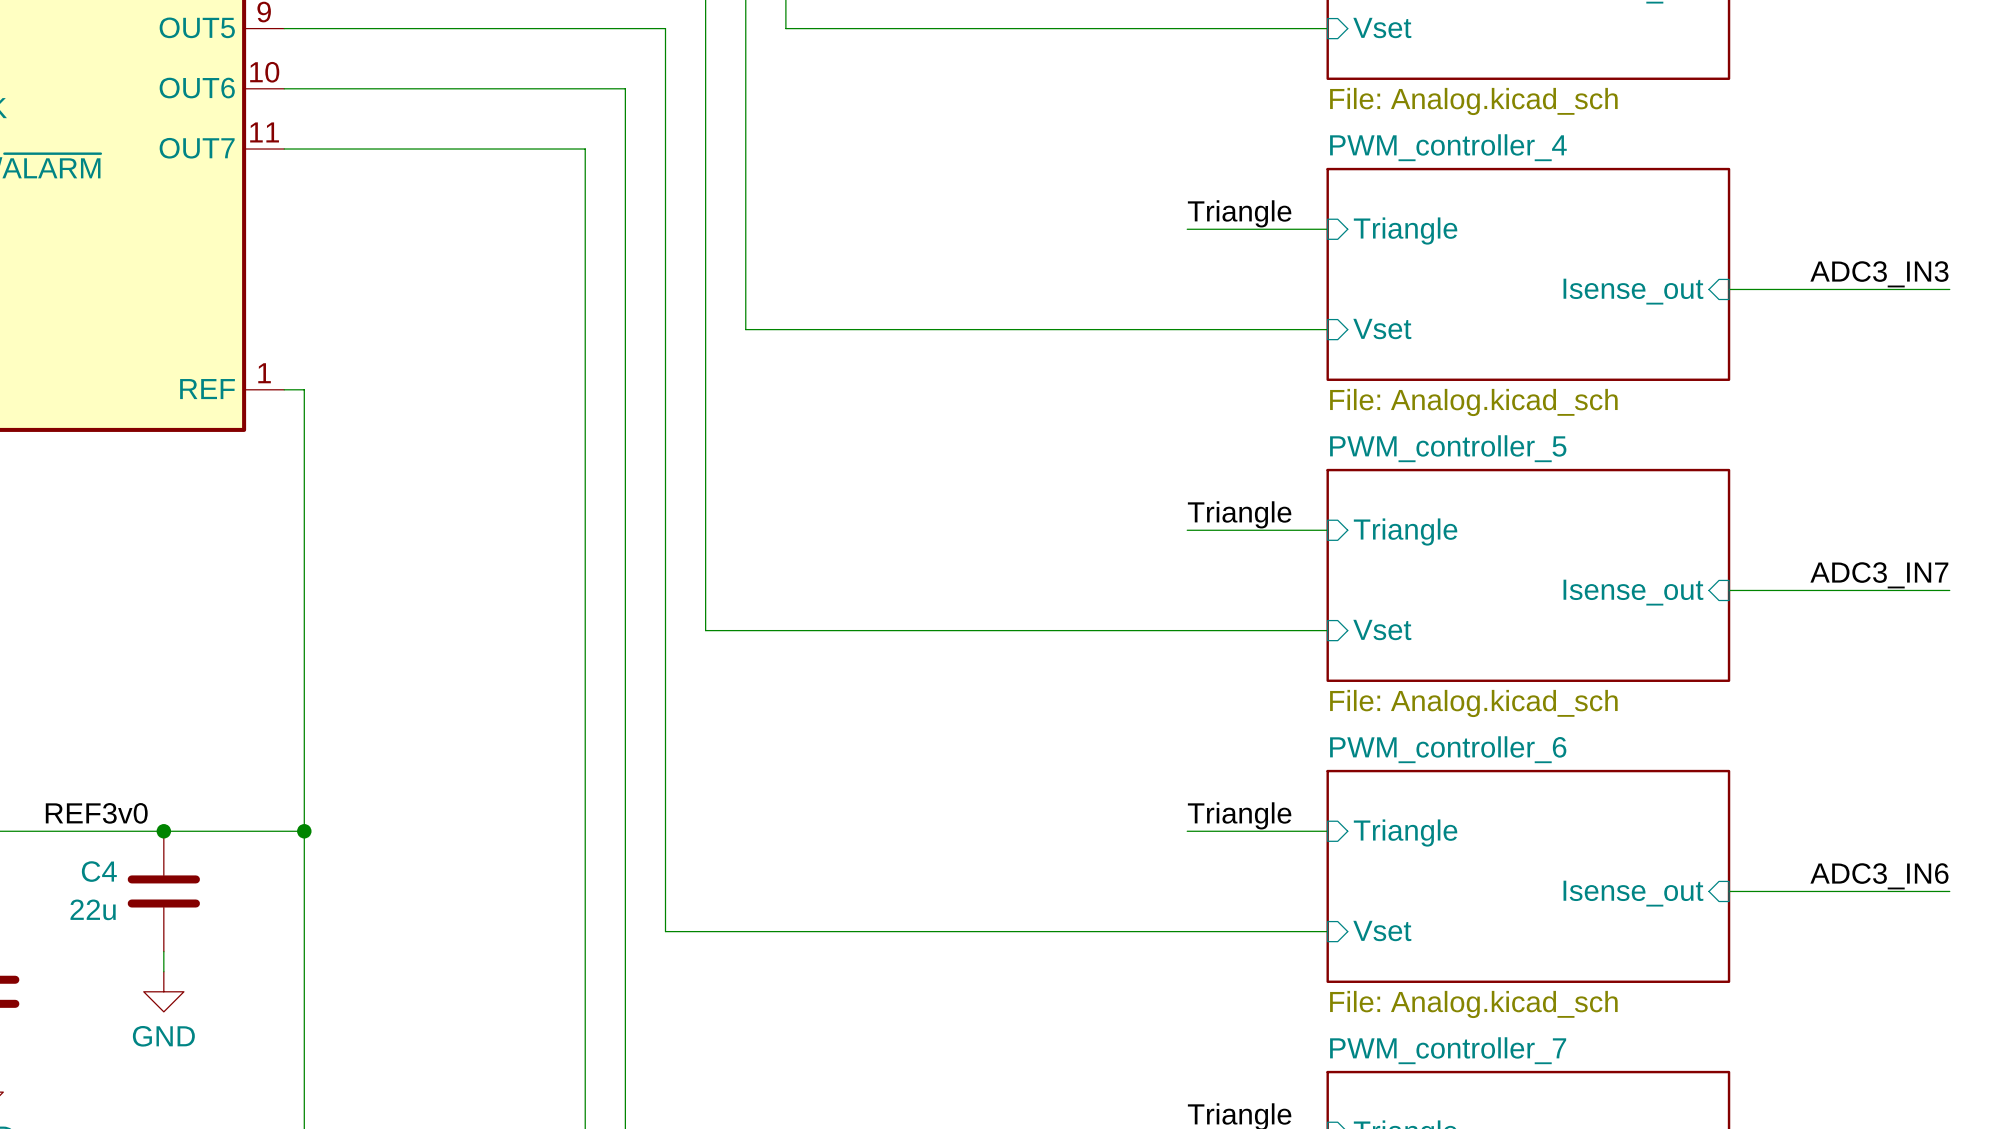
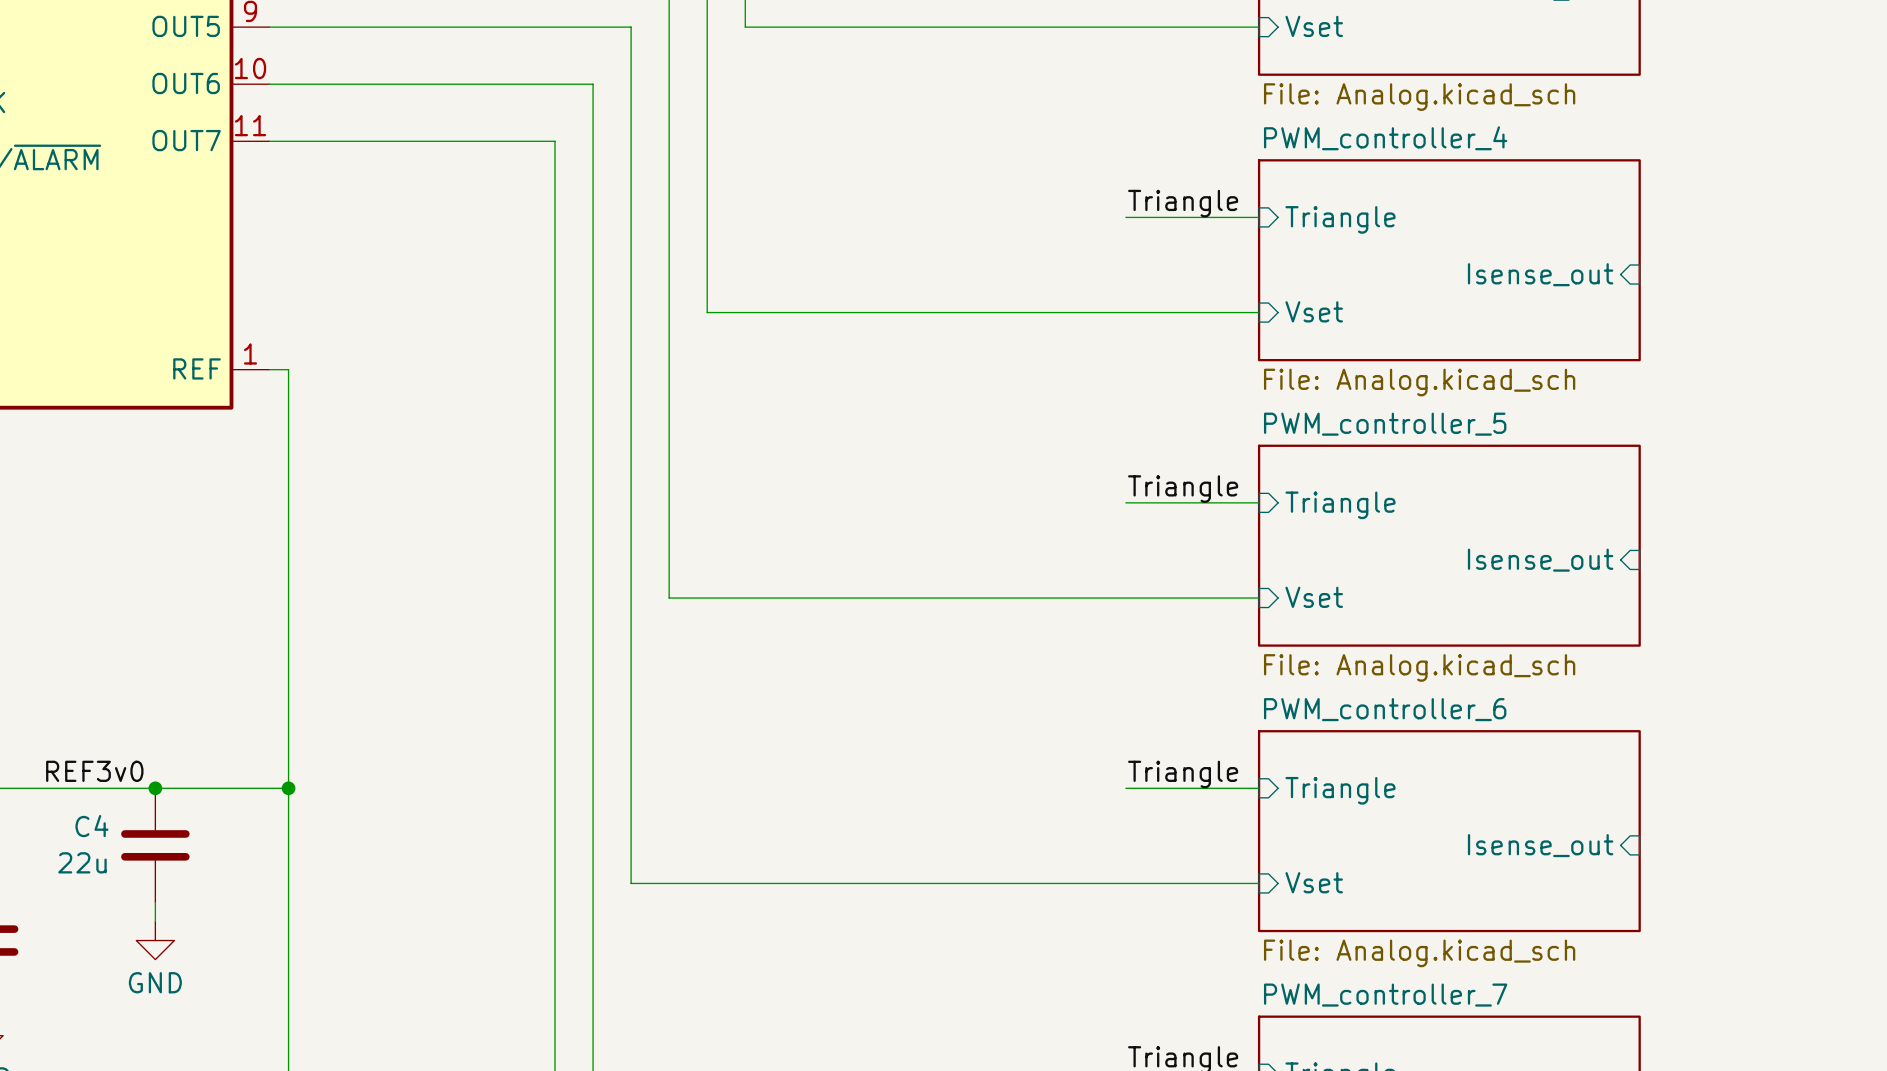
label: ADC3_IN3 (1879, 274) -> none
wire: (1729, 289) (1949, 289) -> none
label: ADC3_IN7 (1879, 575) -> none
wire: (1729, 590) (1949, 590) -> none
label: ADC3_IN6 (1879, 876) -> none
wire: (1729, 891) (1949, 891) -> none

